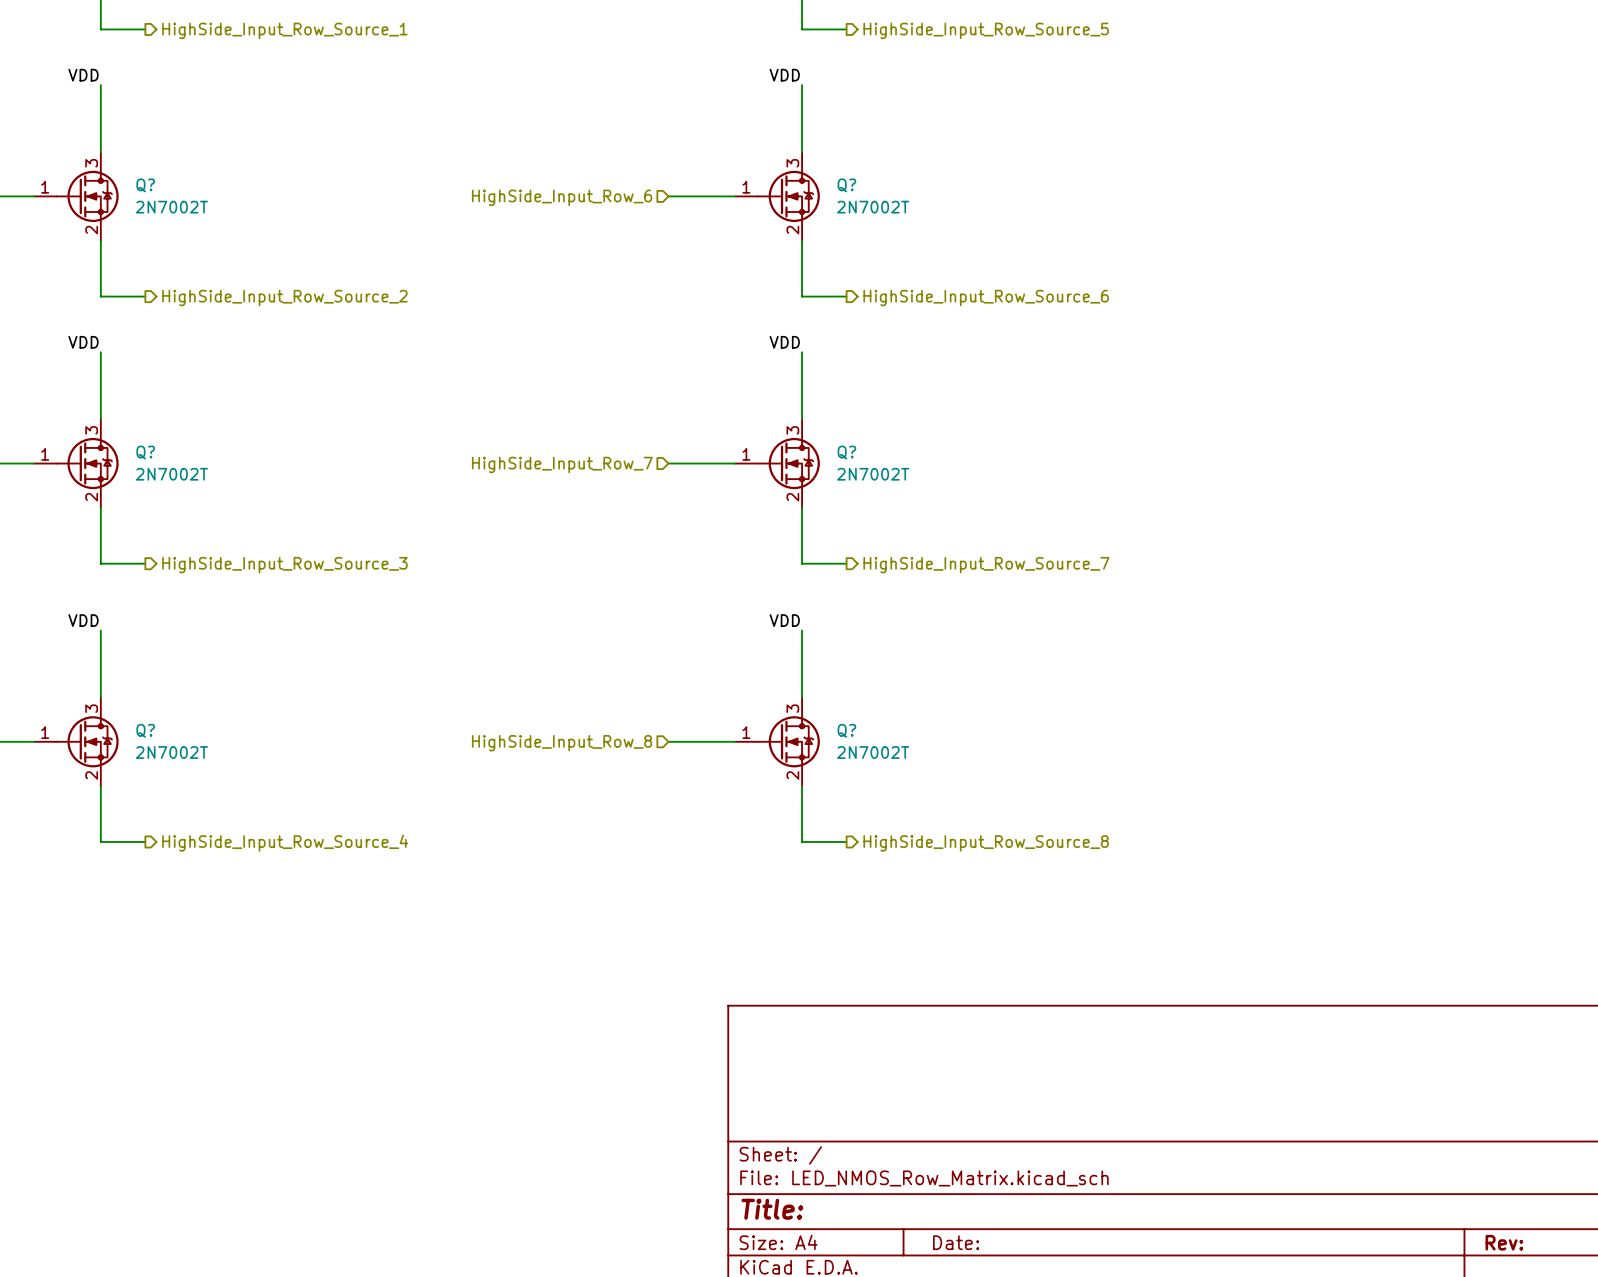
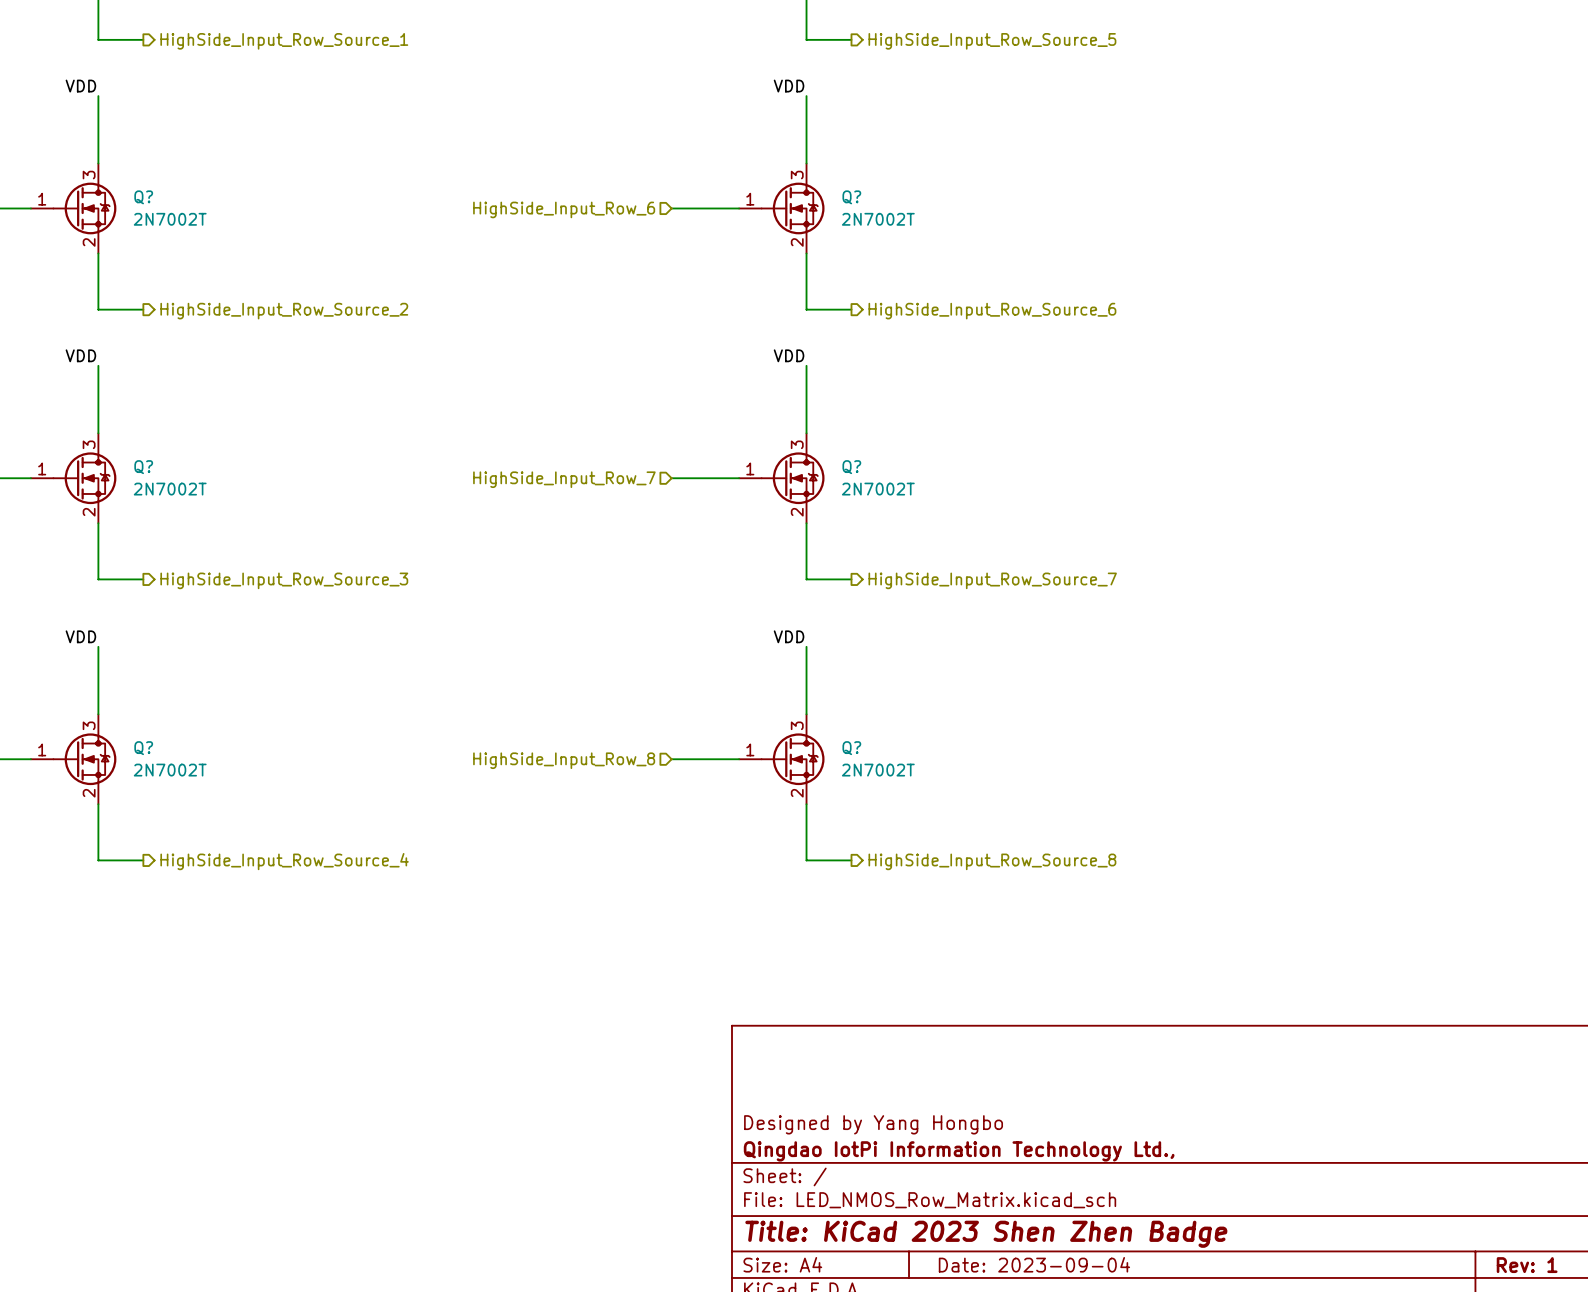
title block: none -> Designed by Yang Hongbo (873, 1124)
title block: none -> Qingdao IotPi Information Technology Ltd., (959, 1151)
title block: Title: (772, 1209) -> Title: KiCad 2023 Shen Zhen Badge (986, 1234)
title block: Date: (956, 1242) -> Date: 2023-09-04 (1034, 1264)
title block: Rev: (1504, 1242) -> Rev: 1 (1527, 1265)

